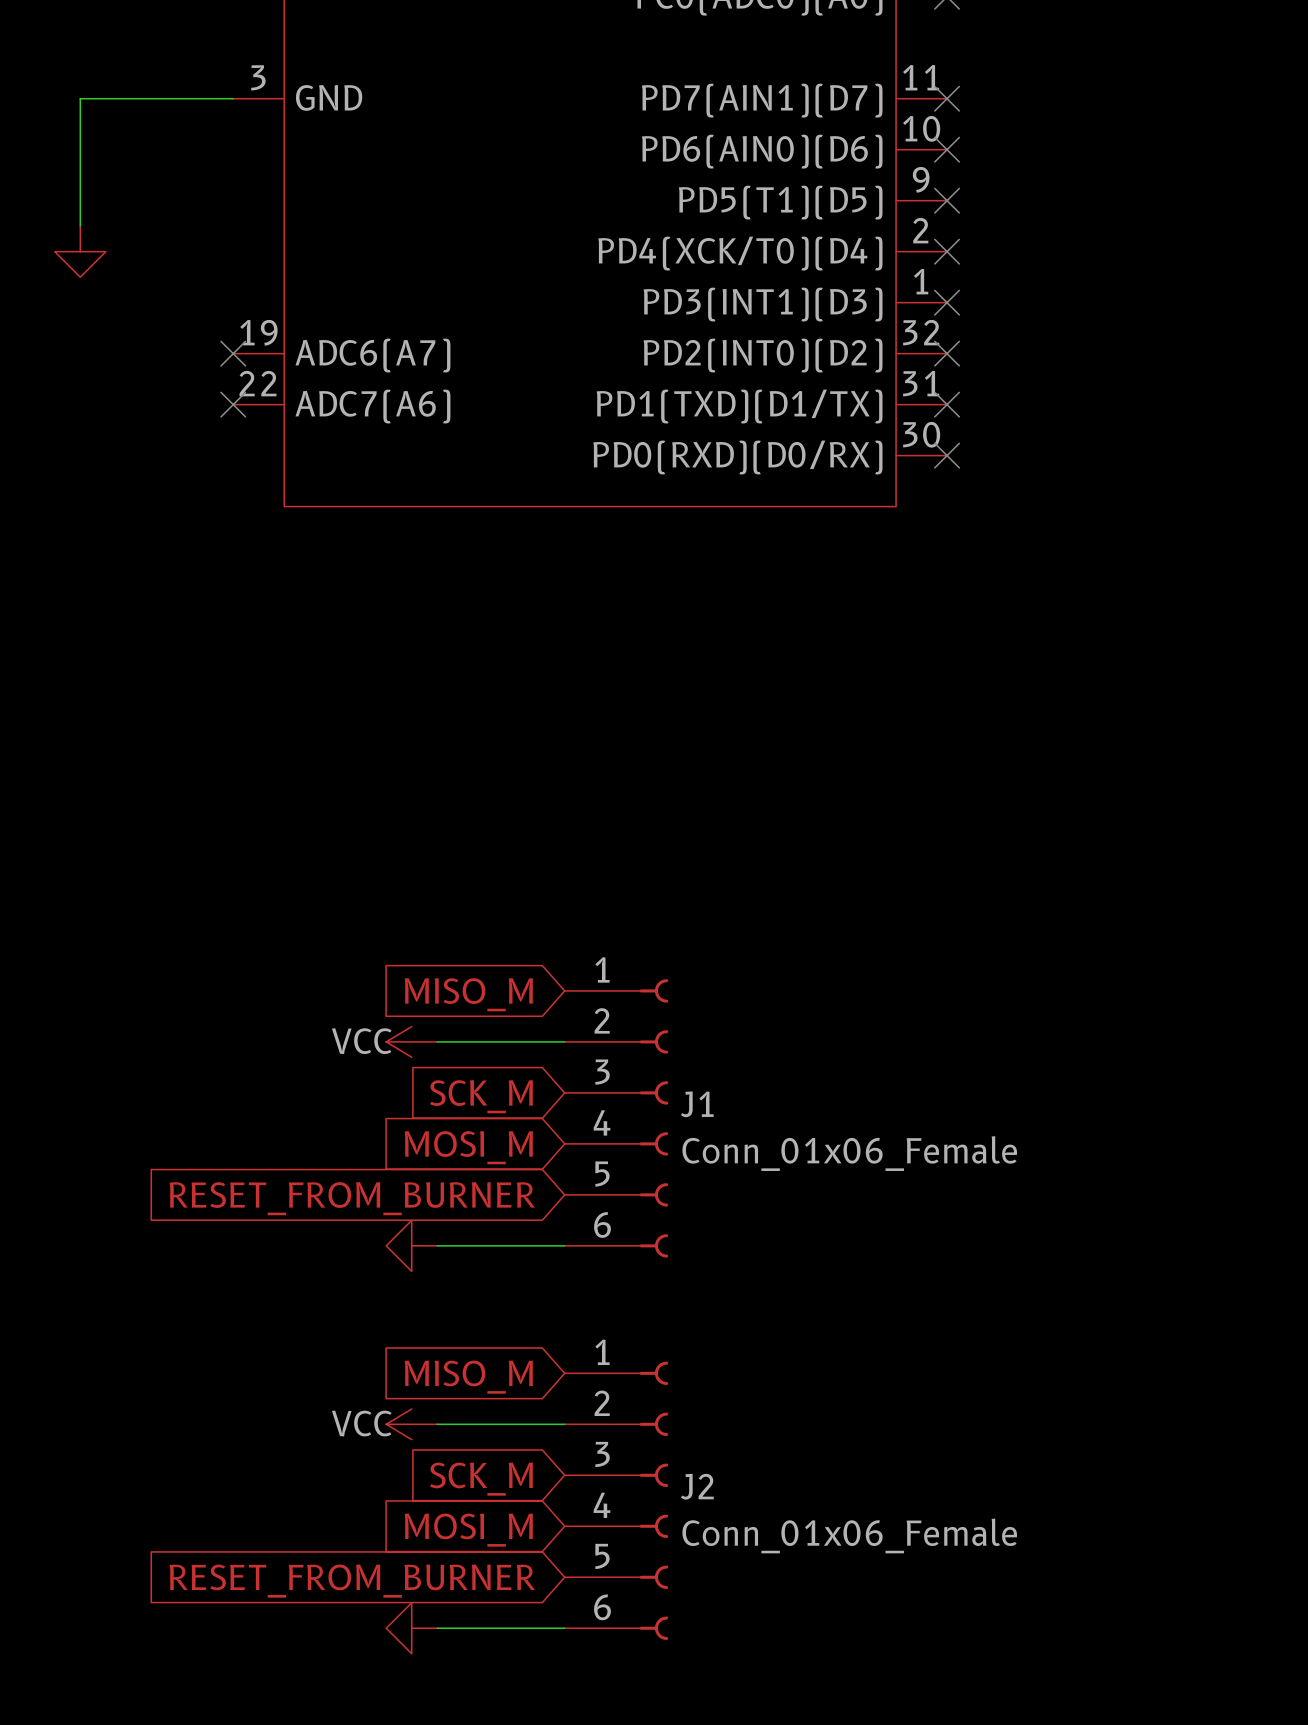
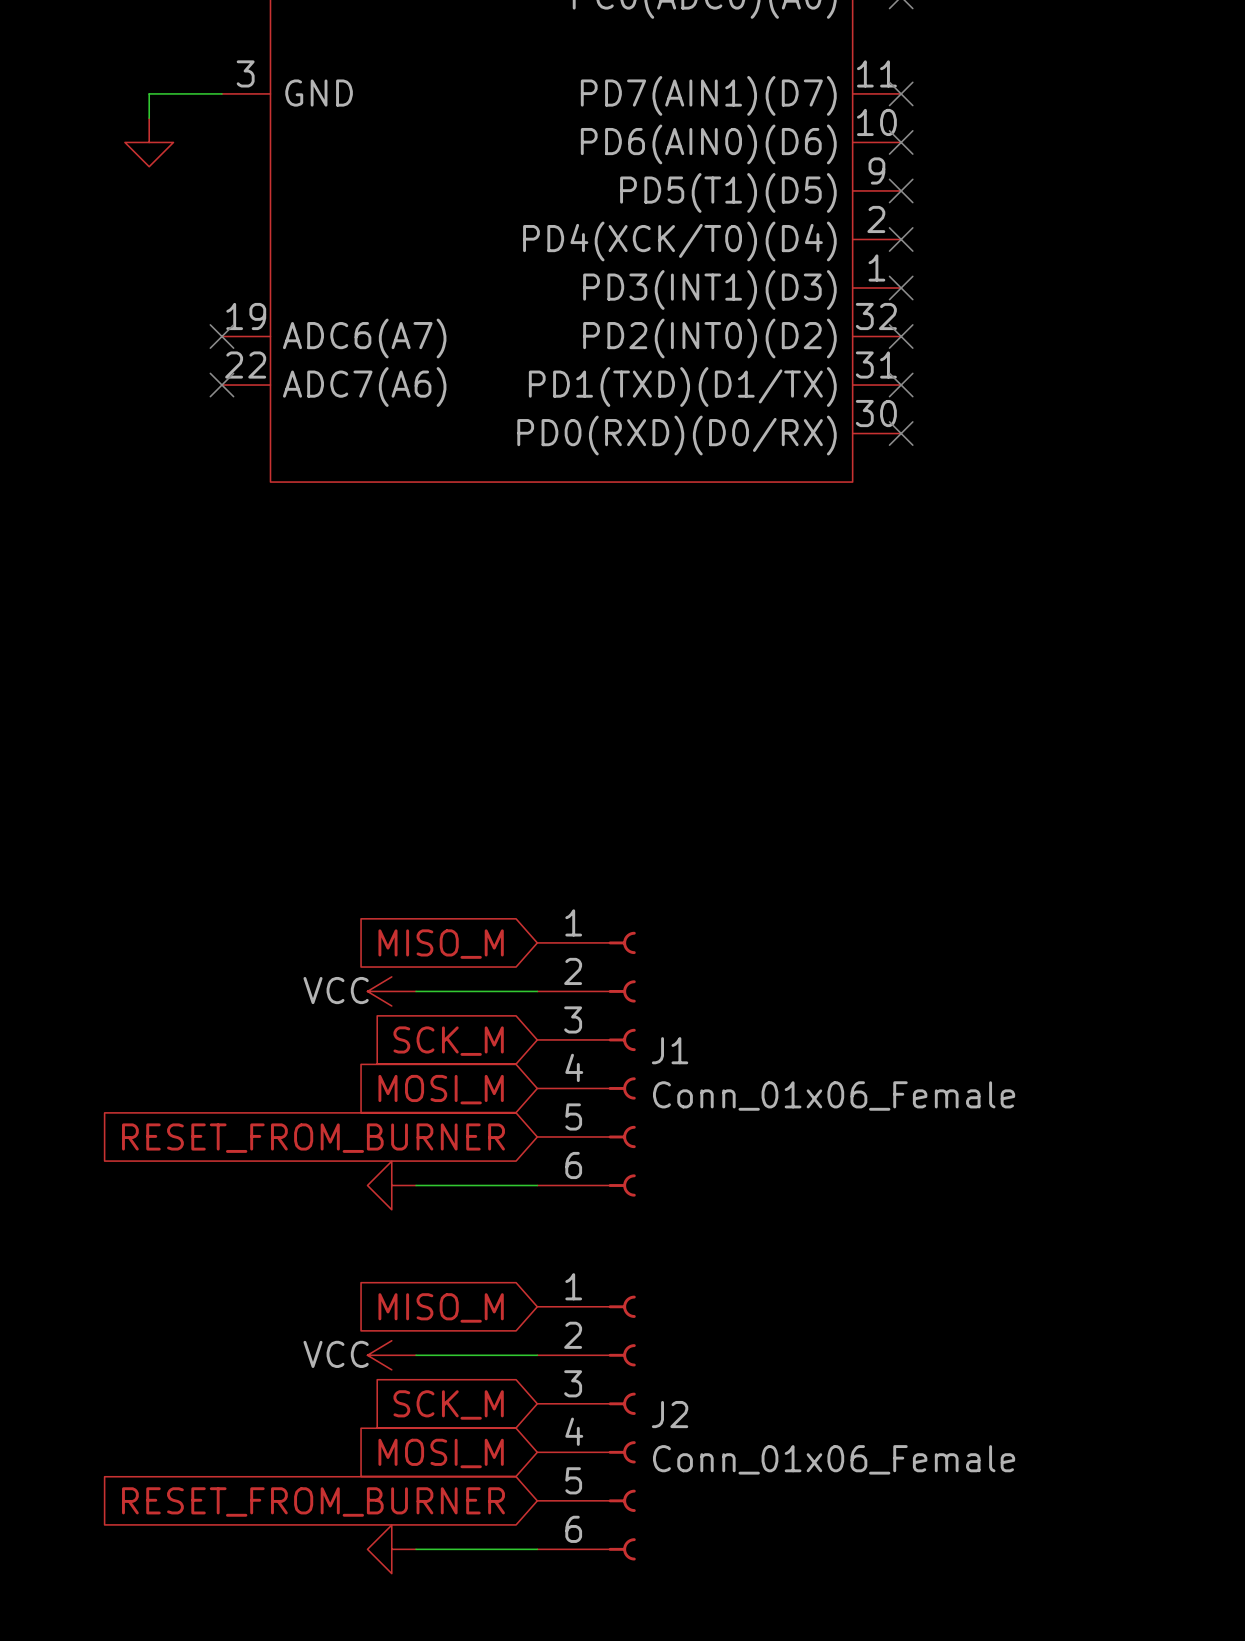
wire: (156, 98) (80, 98) (80, 226) -> (149, 93) (149, 118)
power symbol position: (80, 251) -> (149, 142)

